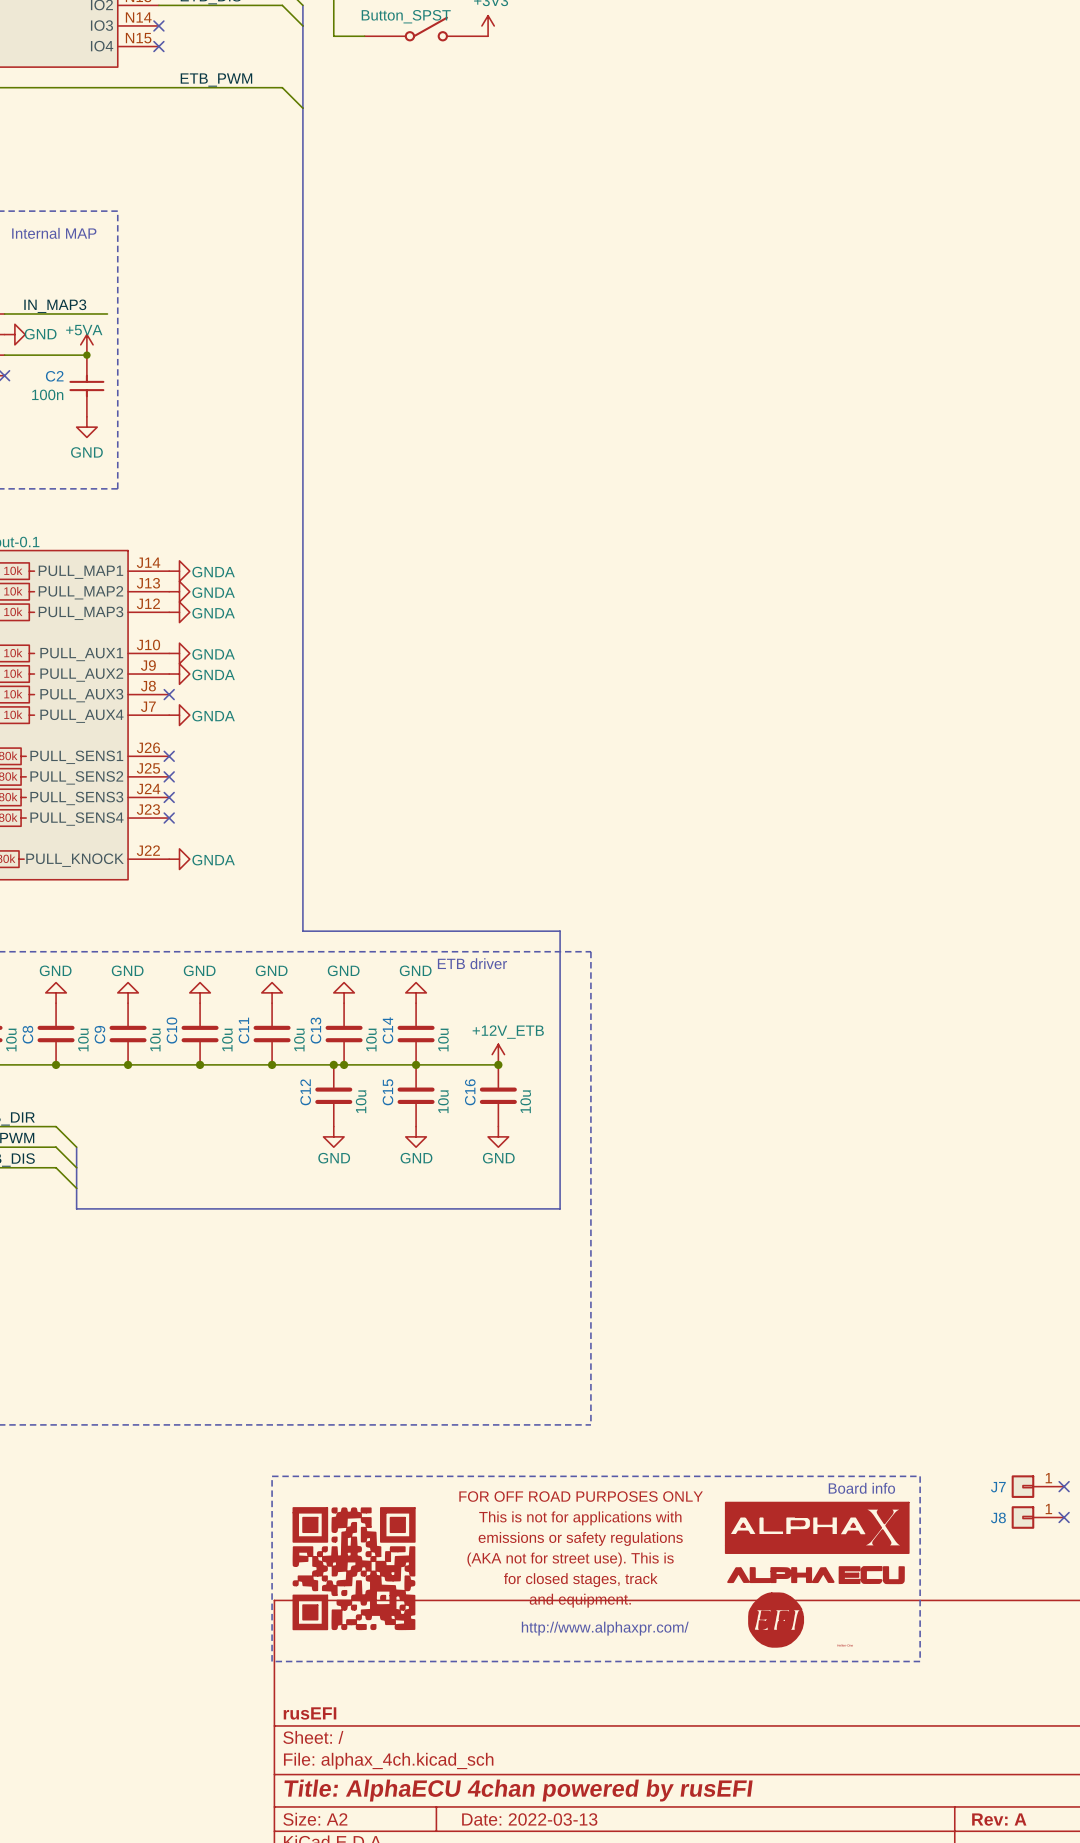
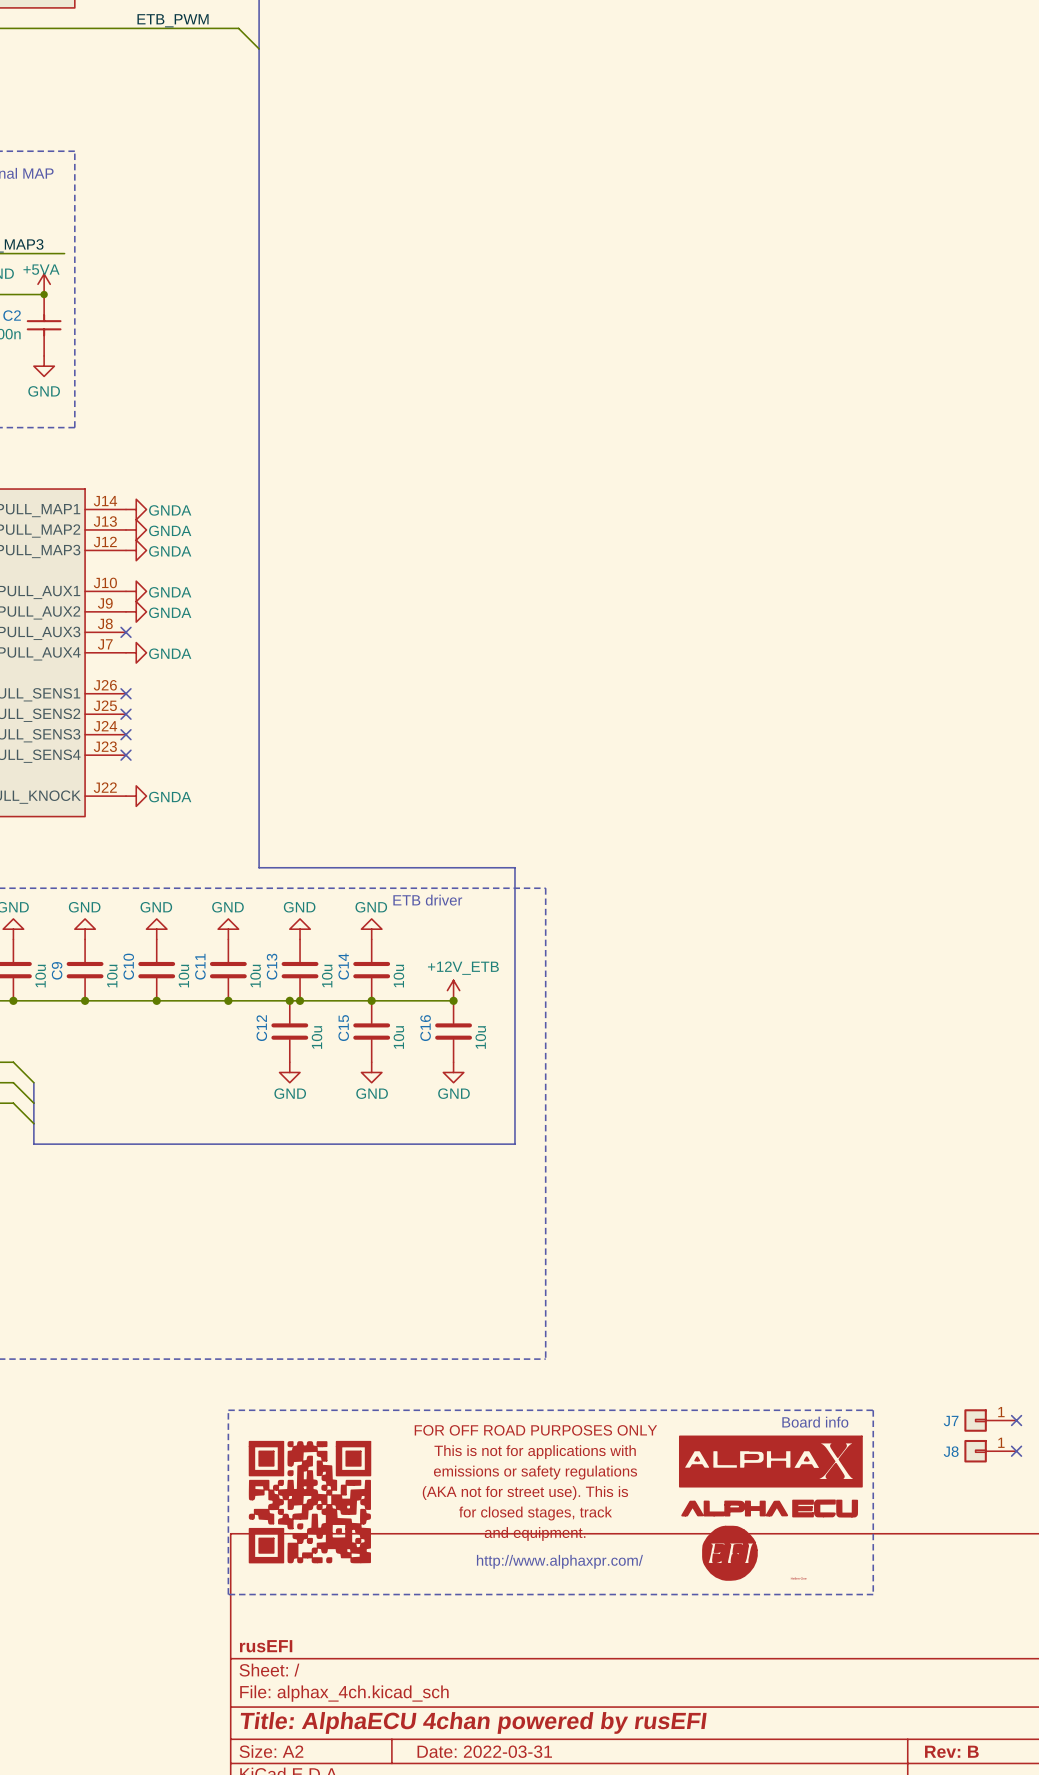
title block: Date: 2022-03-13 (529, 1819) -> Date: 2022-03-31 (484, 1751)
title block: Rev: A (999, 1819) -> Rev: B (951, 1751)

